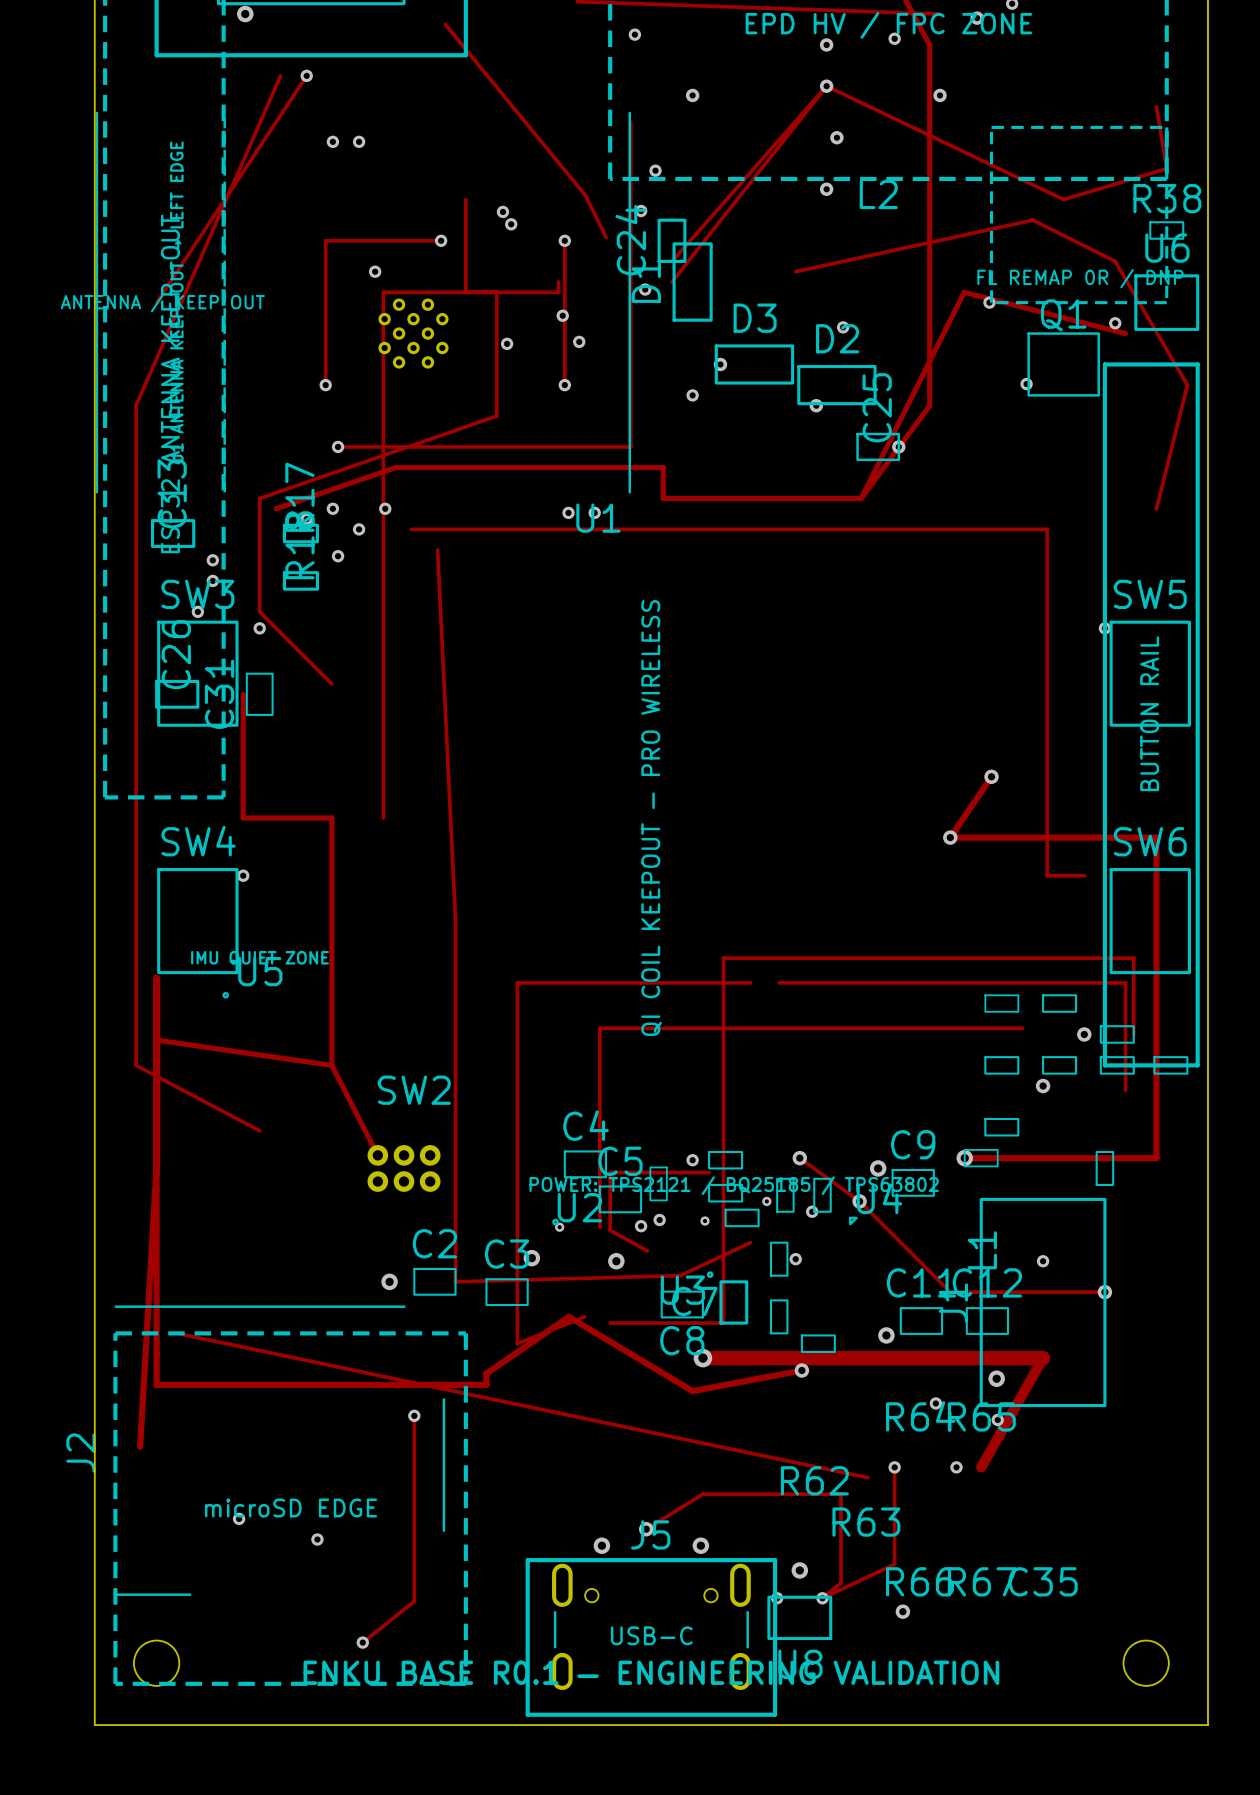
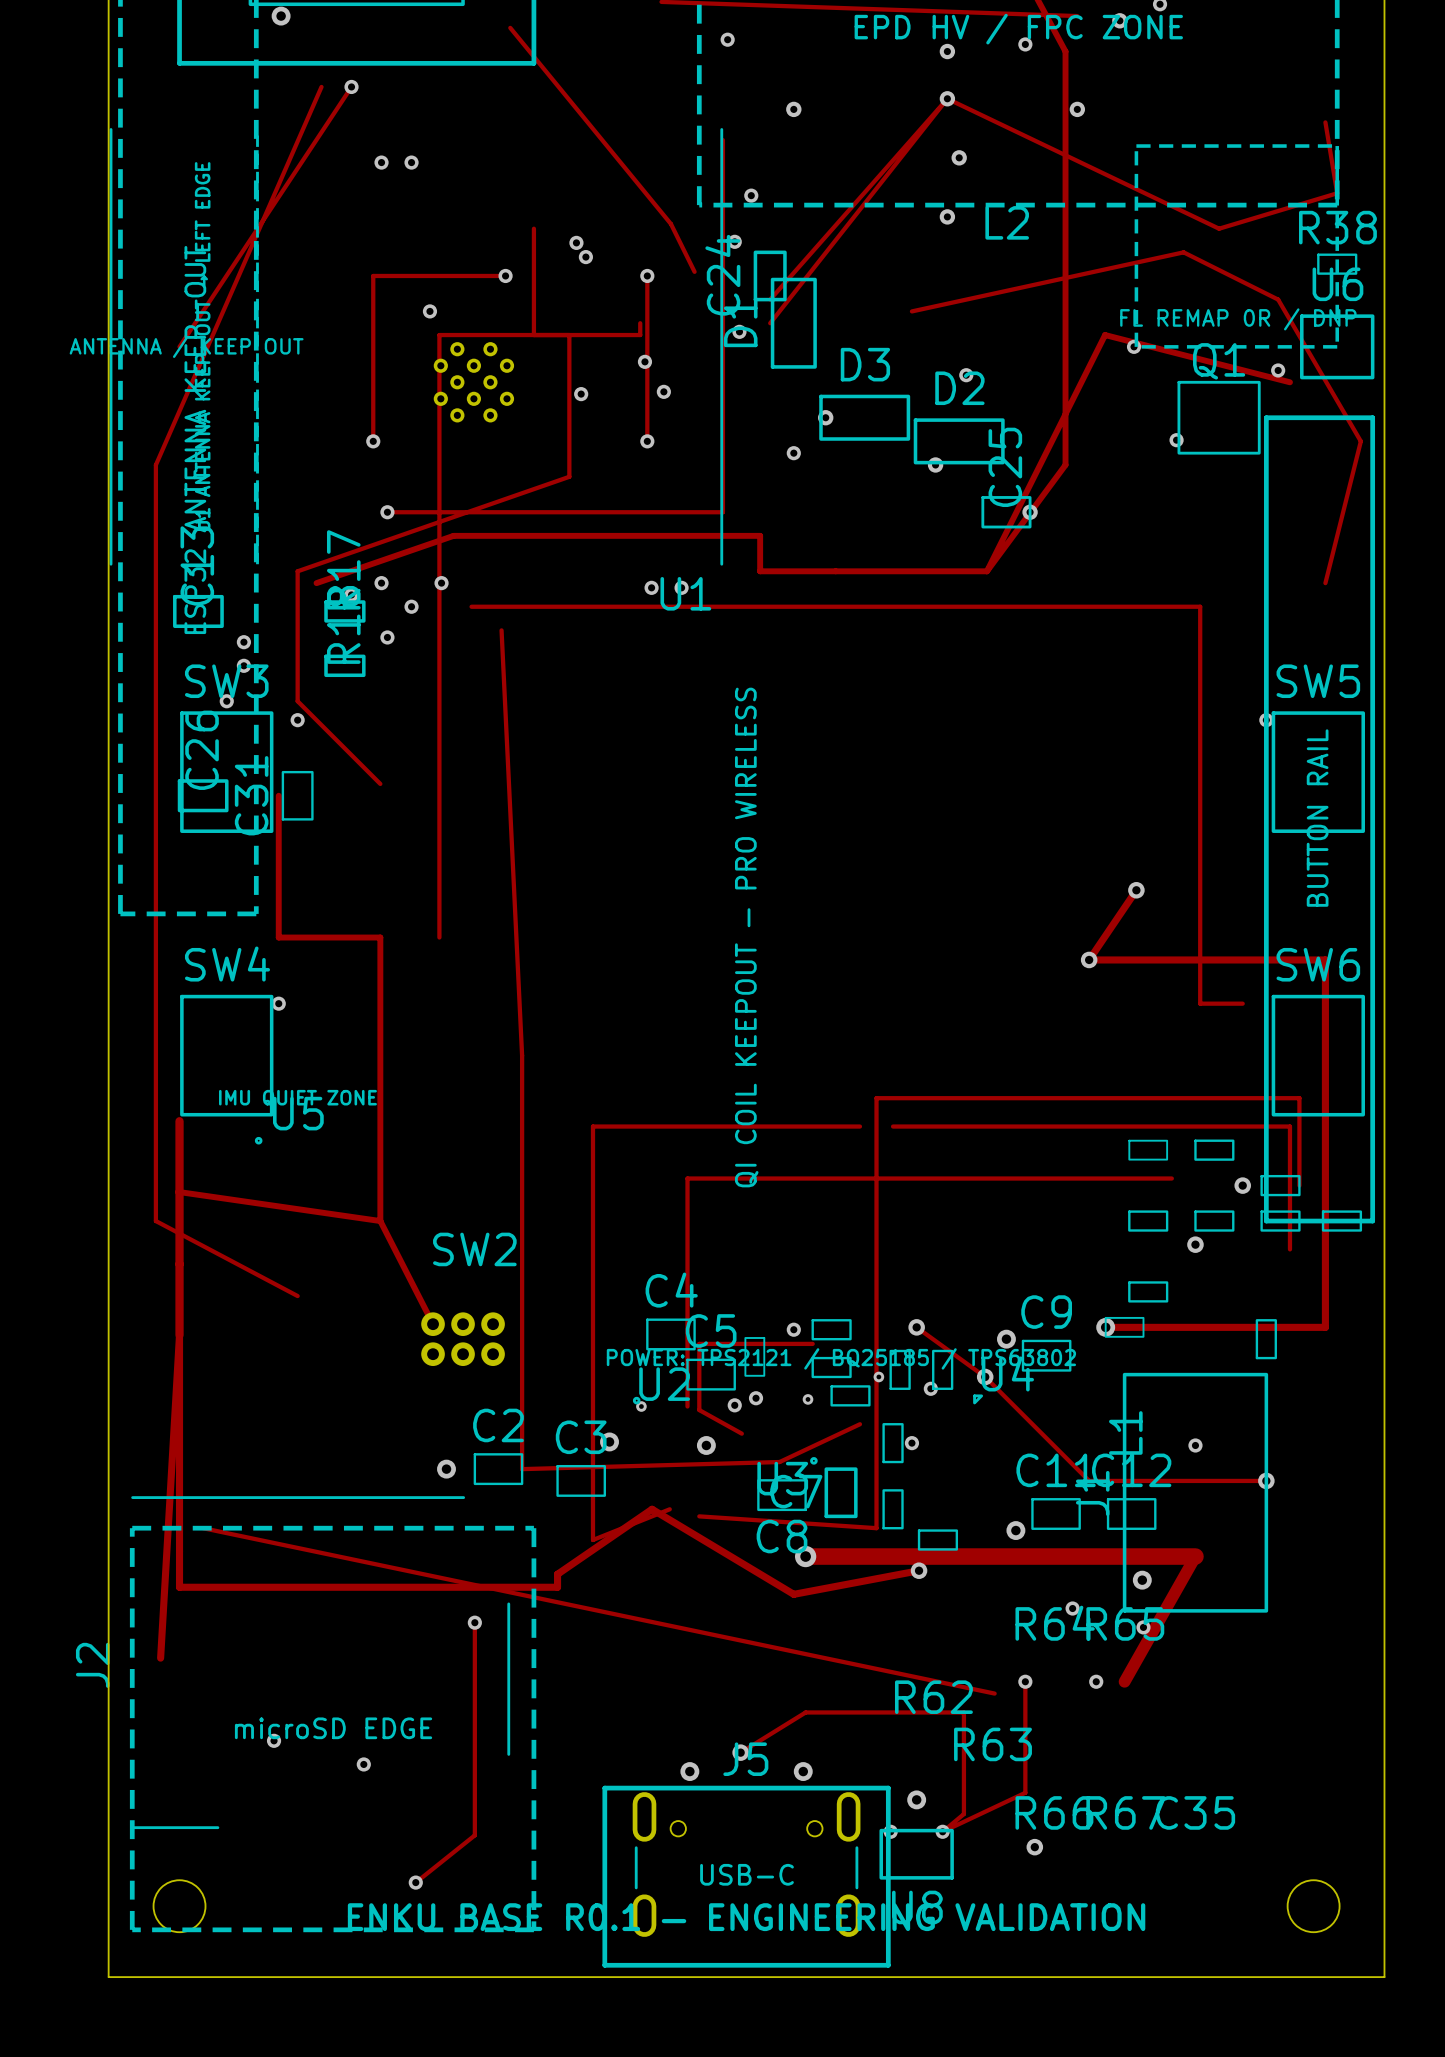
track: (764, 958) (723, 958) (723, 1323) (610, 1323) -> (876, 1098) (876, 1528) (699, 1516)

